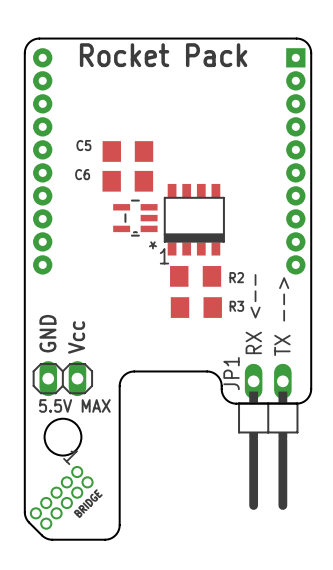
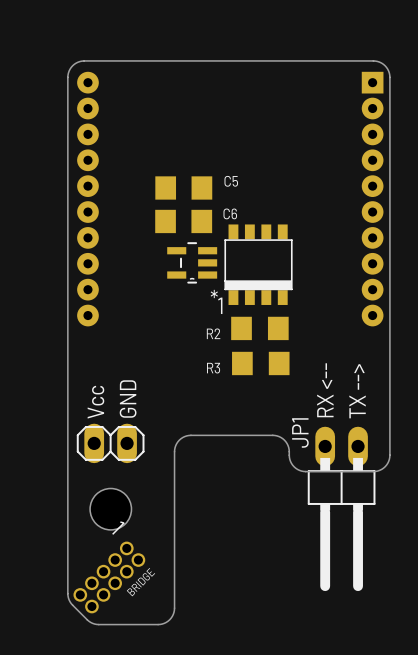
text: Rocket Pack (163, 55) -> none
C5 name position: C5 (83, 145) -> C5 (231, 181)
C6 name position: C6 (82, 174) -> C6 (230, 213)
R2 name position: R2 (236, 277) -> R2 (213, 333)
R3 name position: R3 (236, 306) -> R3 (213, 368)
text: GND (47, 333) -> Vcc (95, 402)
text: Vcc (76, 337) -> GND (128, 399)
text: 5.5V MAX (74, 405) -> none

